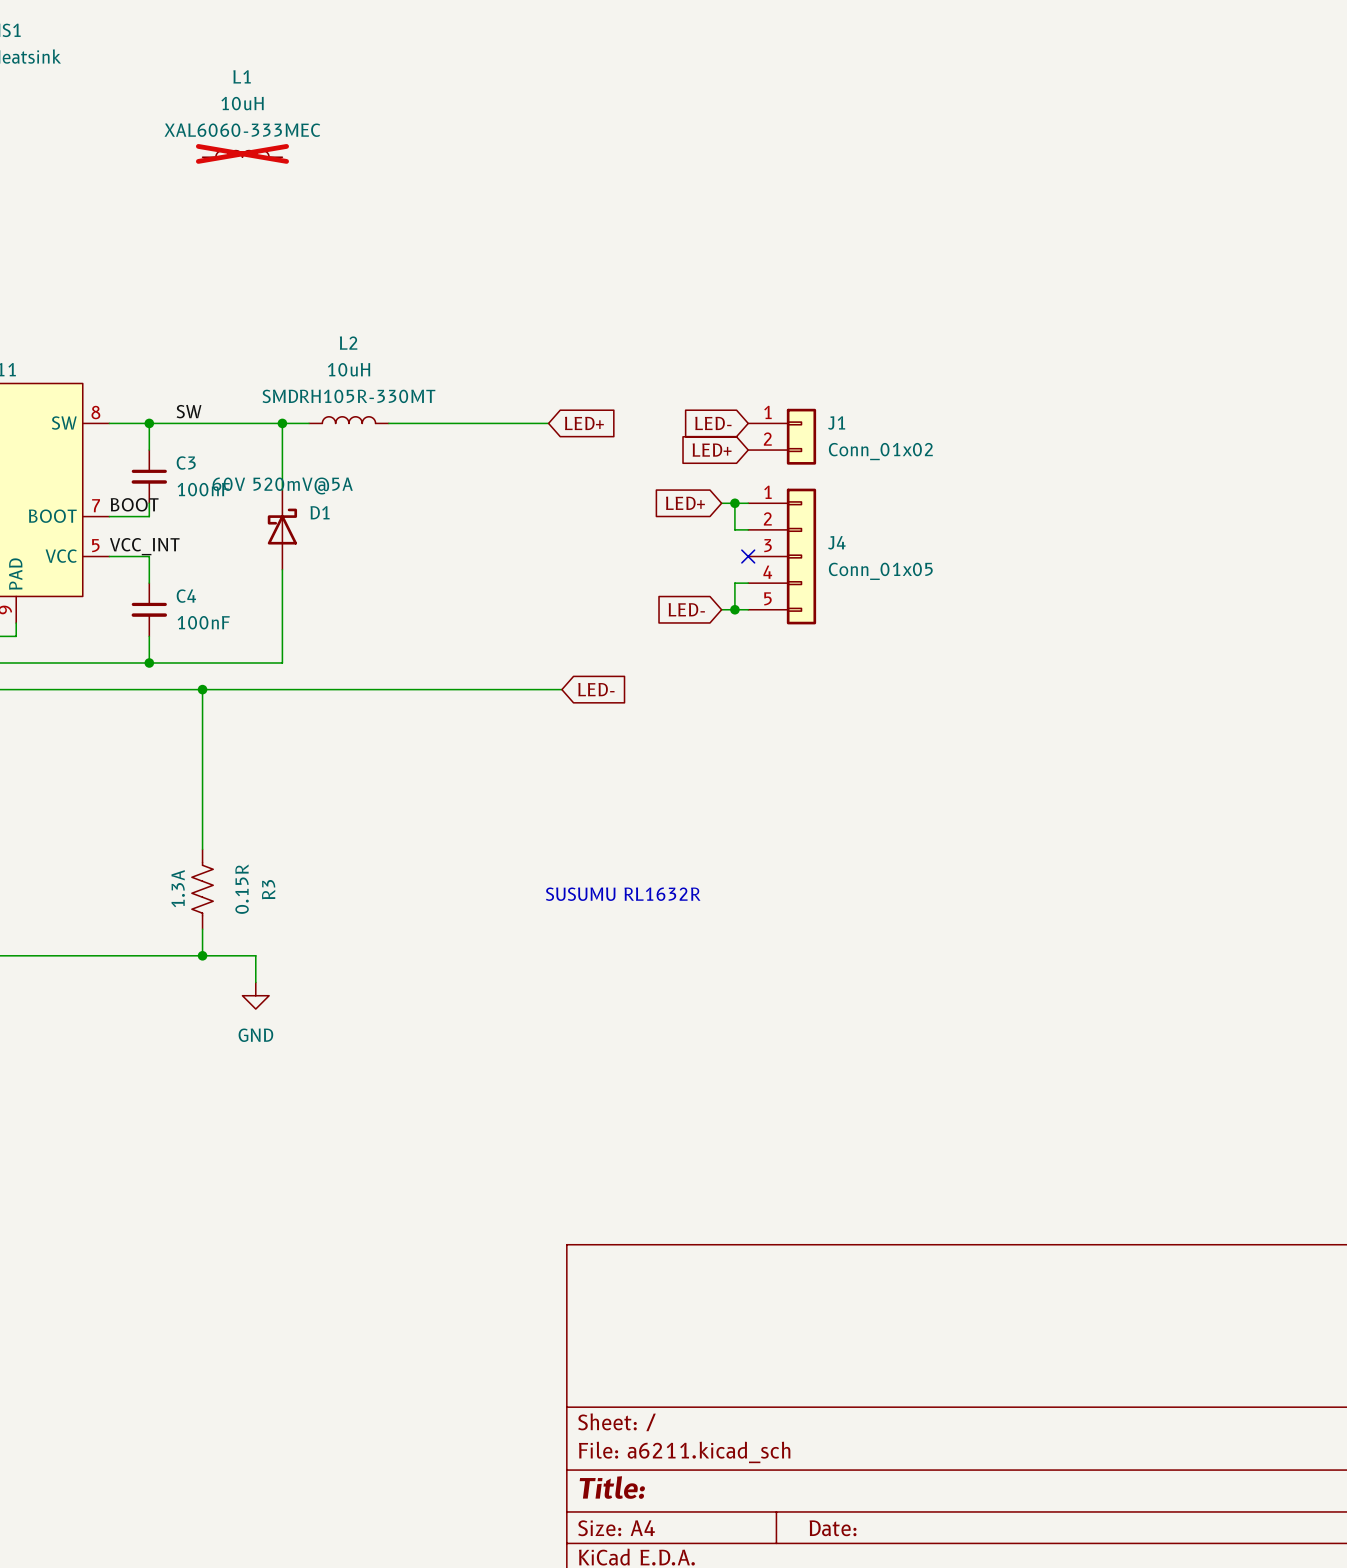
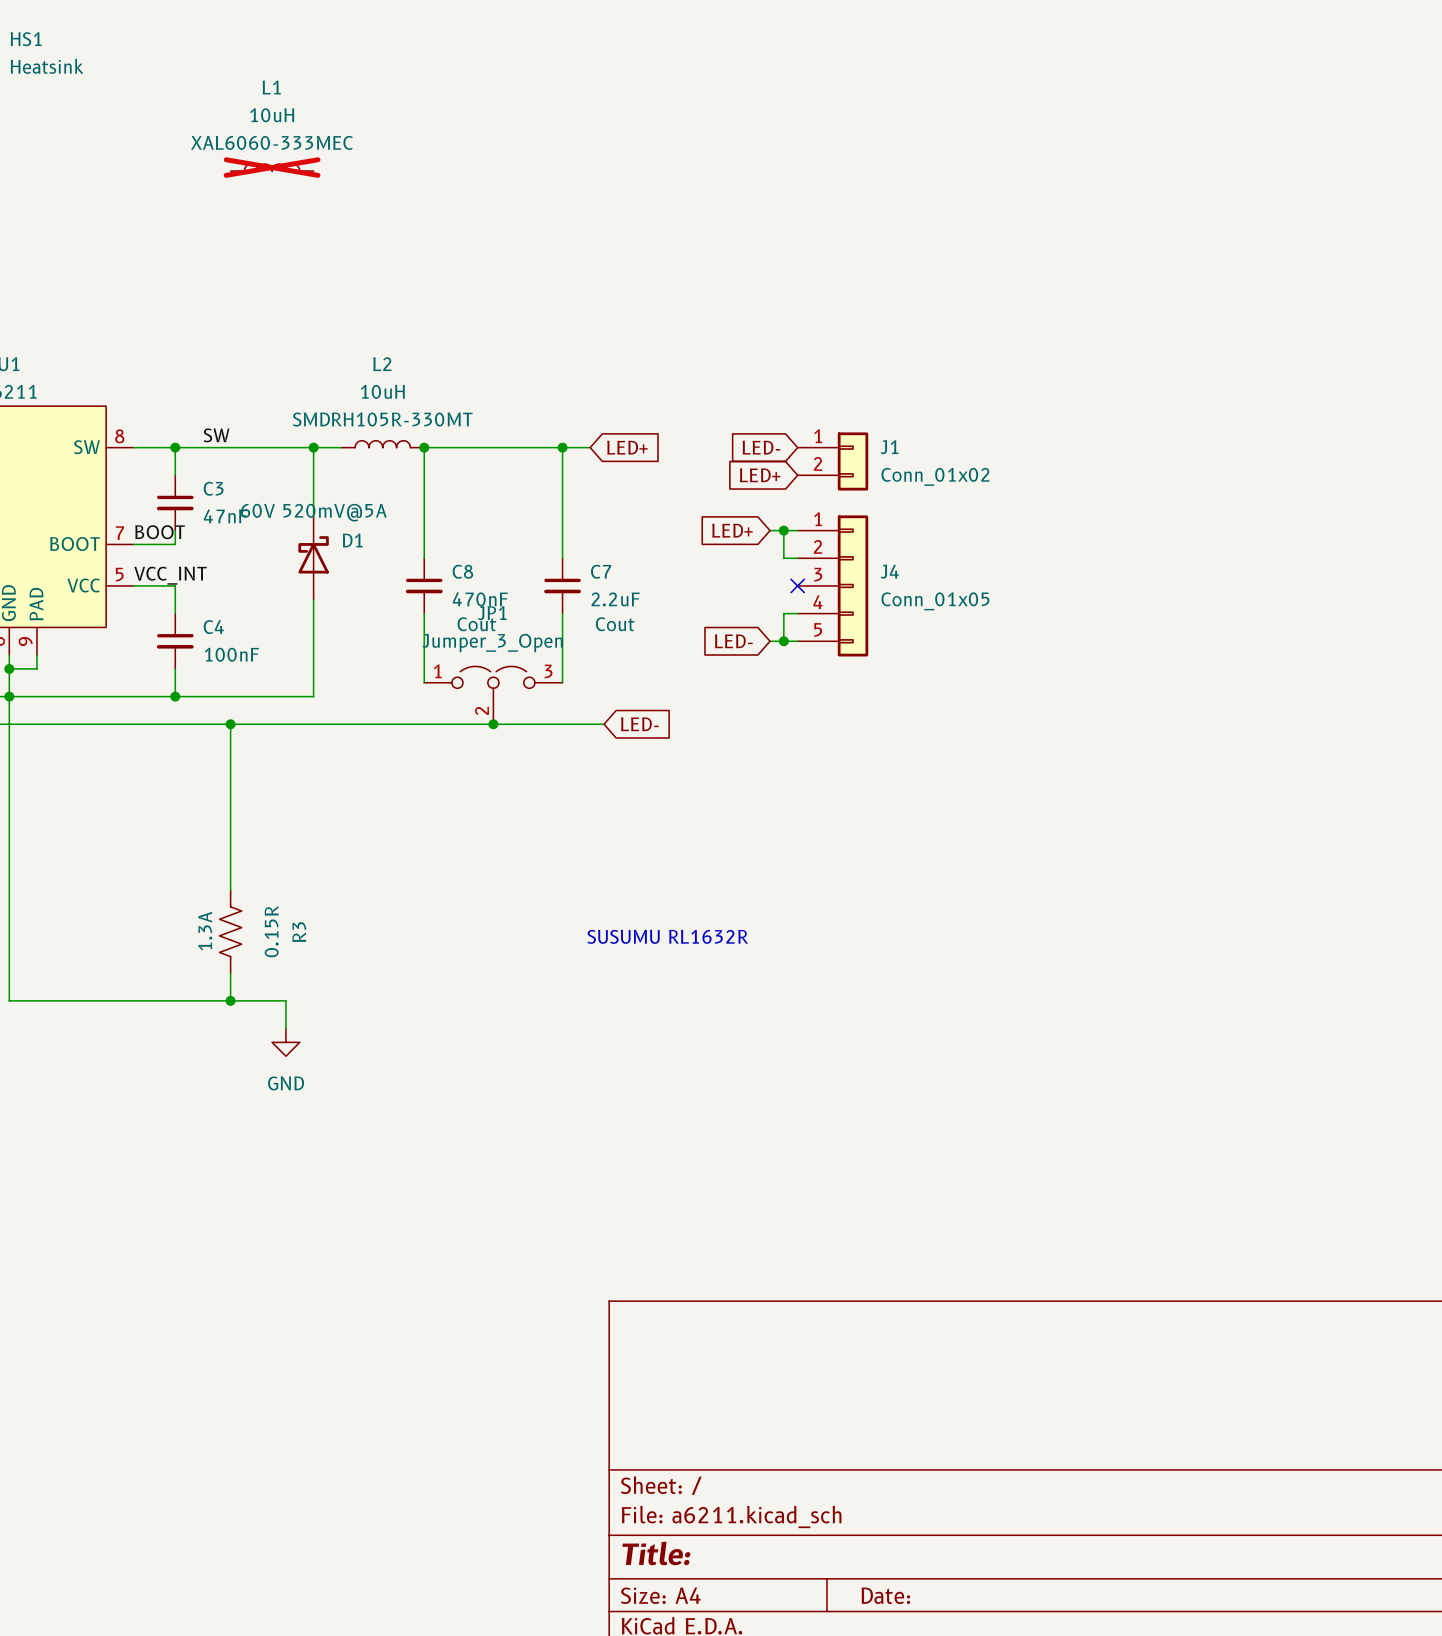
wire: none -> (424, 447) (424, 558)
junction: none -> (424, 447)
wire: none -> (562, 447) (562, 558)
junction: none -> (562, 447)
C3 value: 100nF (203, 489) -> 47nF (225, 516)
C8: none -> 470nF (424, 585)
C7: none -> 2.2uF (562, 585)
wire: none -> (424, 613) (424, 682)
wire: none -> (562, 613) (562, 682)
JP1: none -> Jumper_3_Open (493, 695)
junction: none -> (493, 724)

